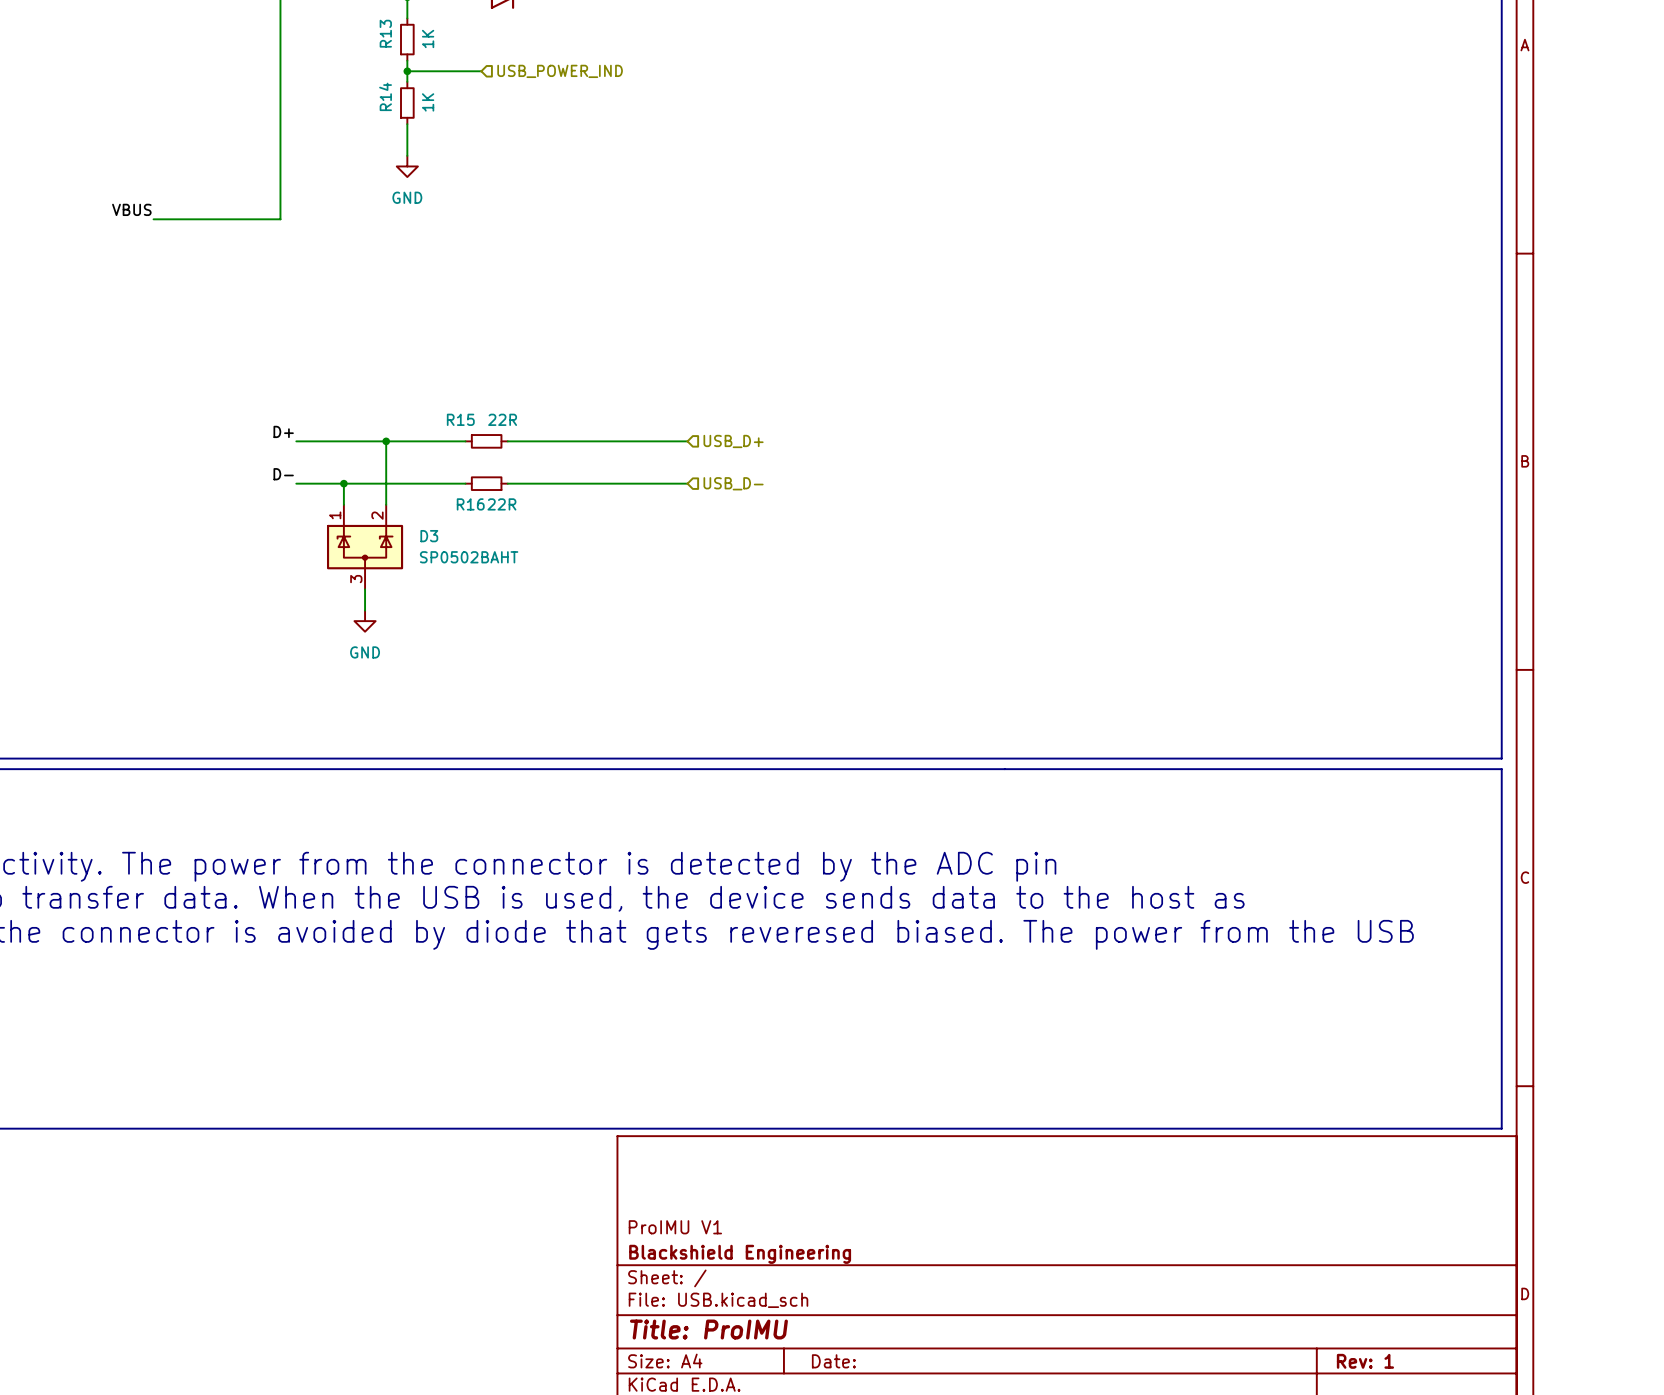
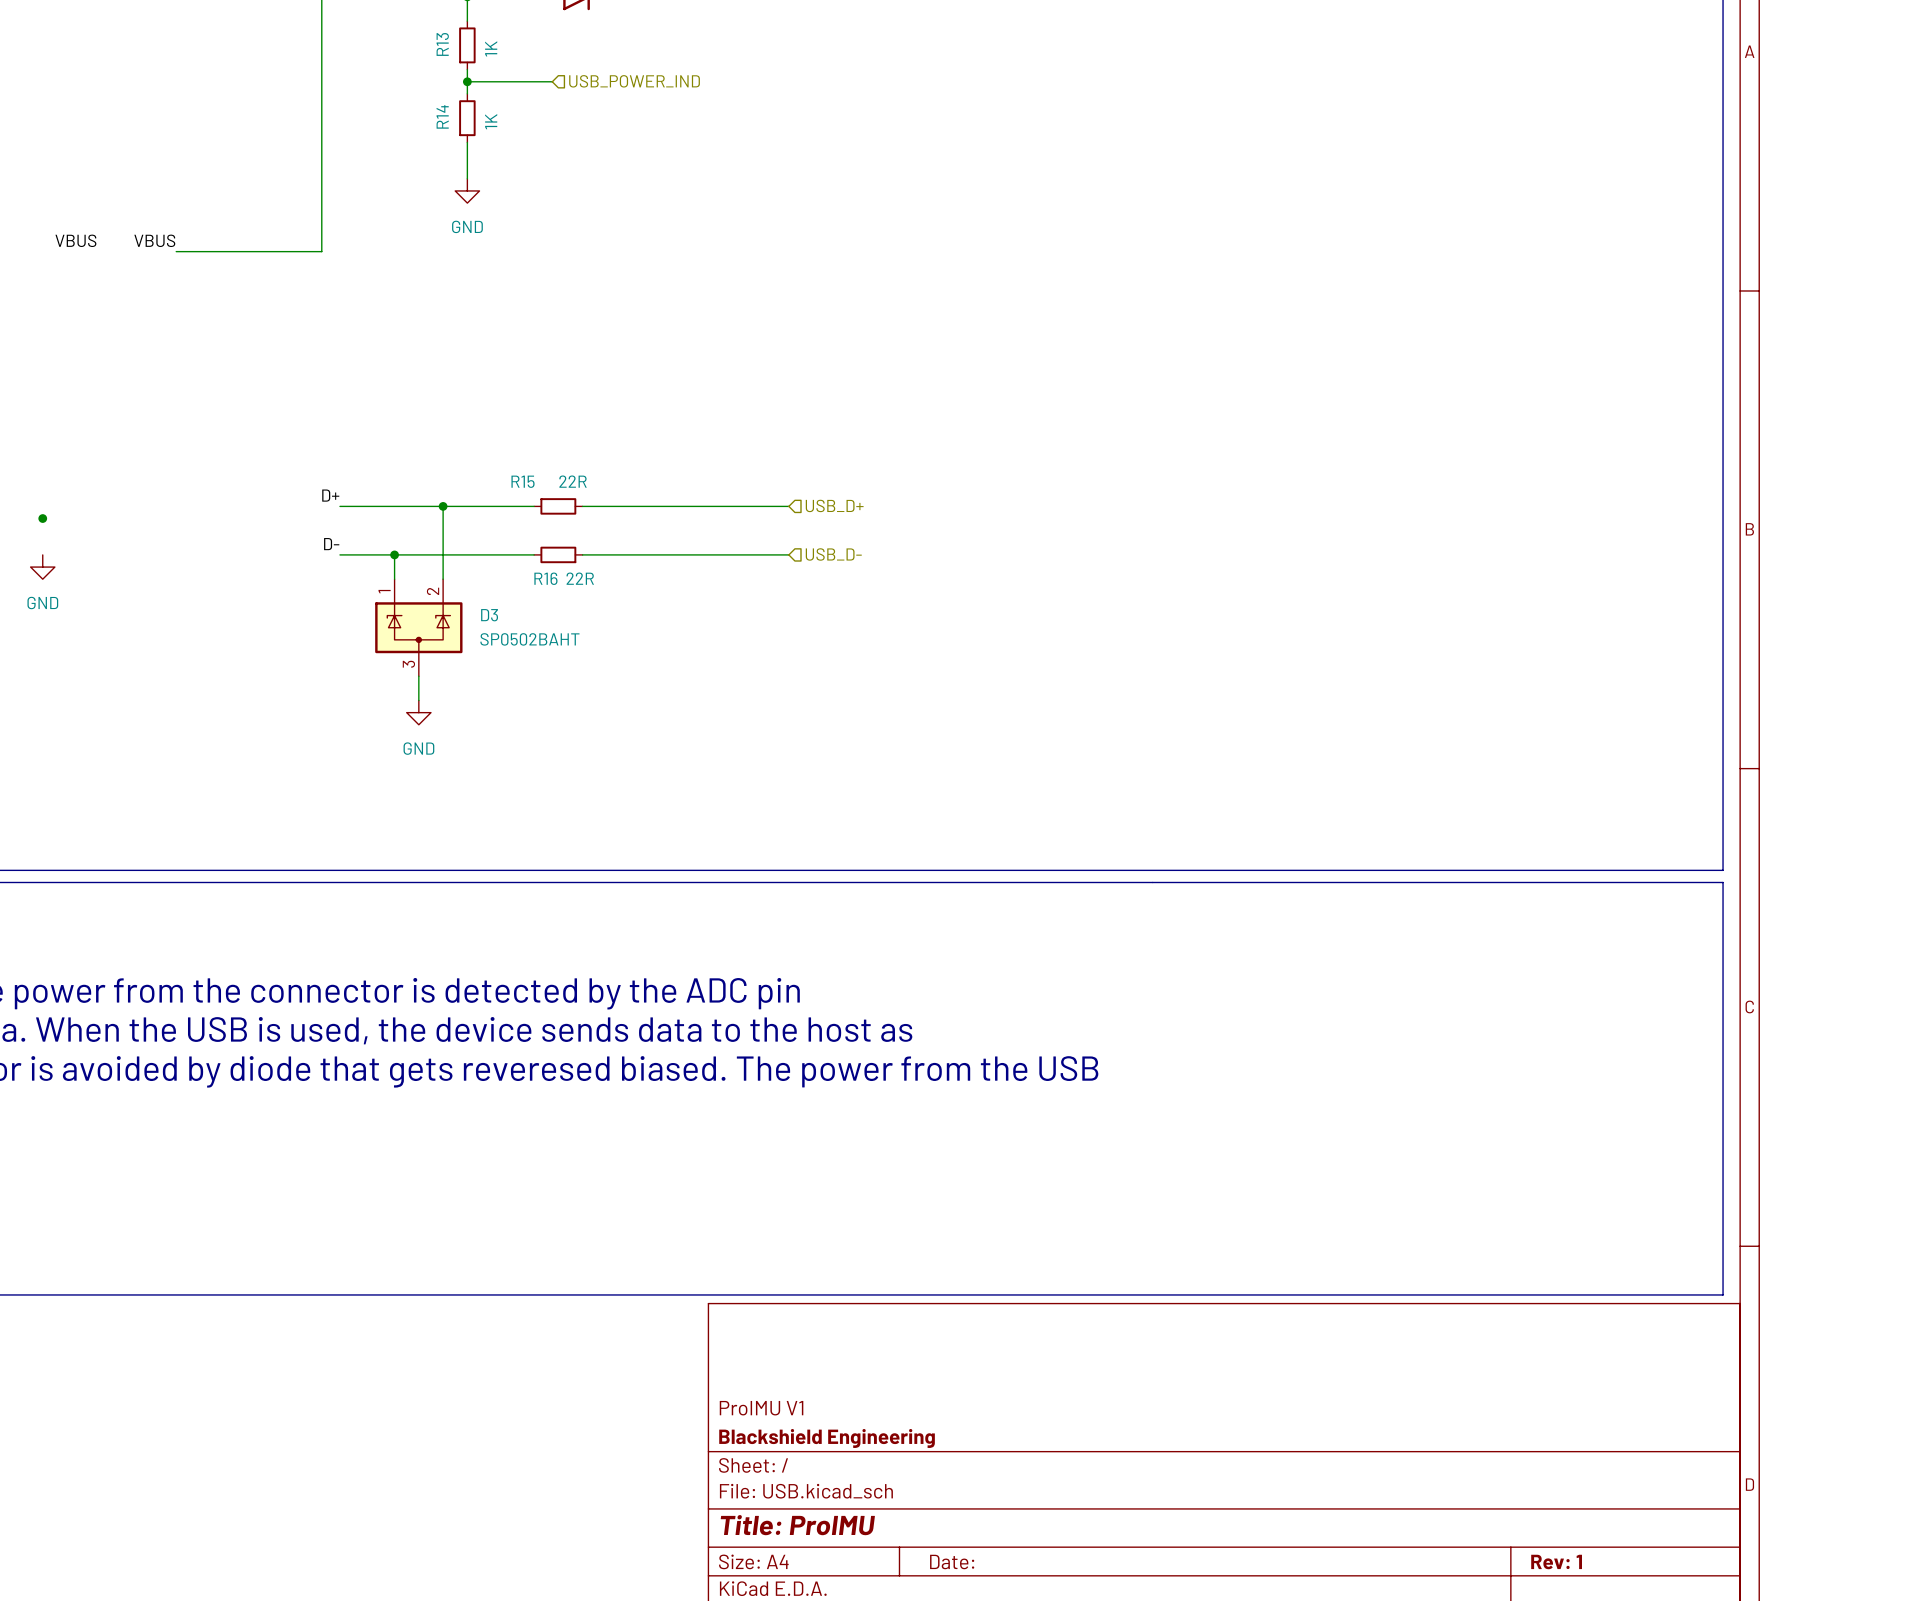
label: none -> VBUS (75, 240)
junction: none -> (42, 518)
power symbol: none -> GND (42, 567)

